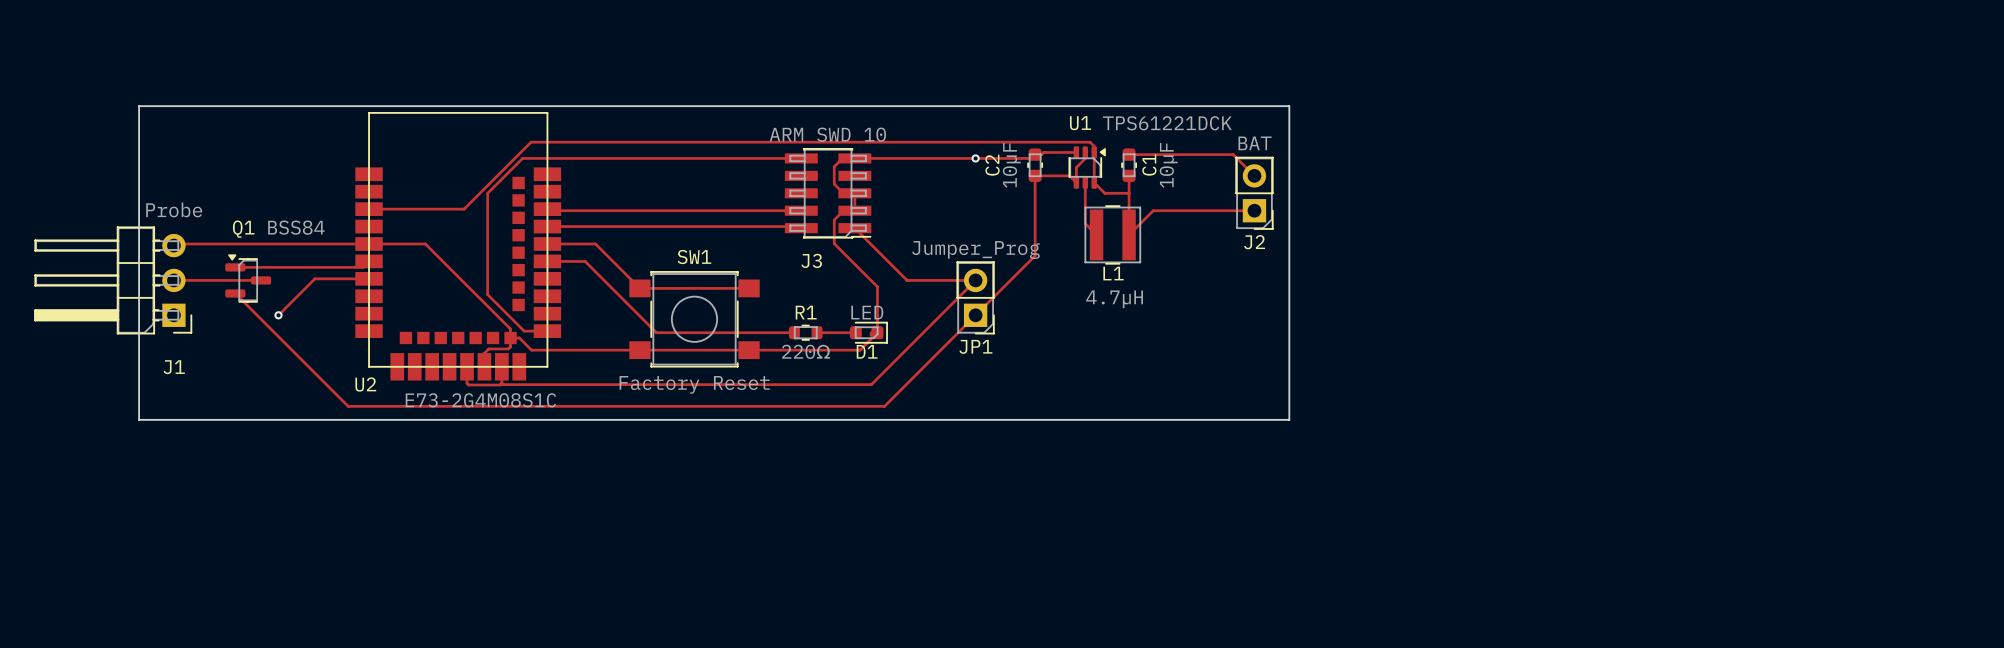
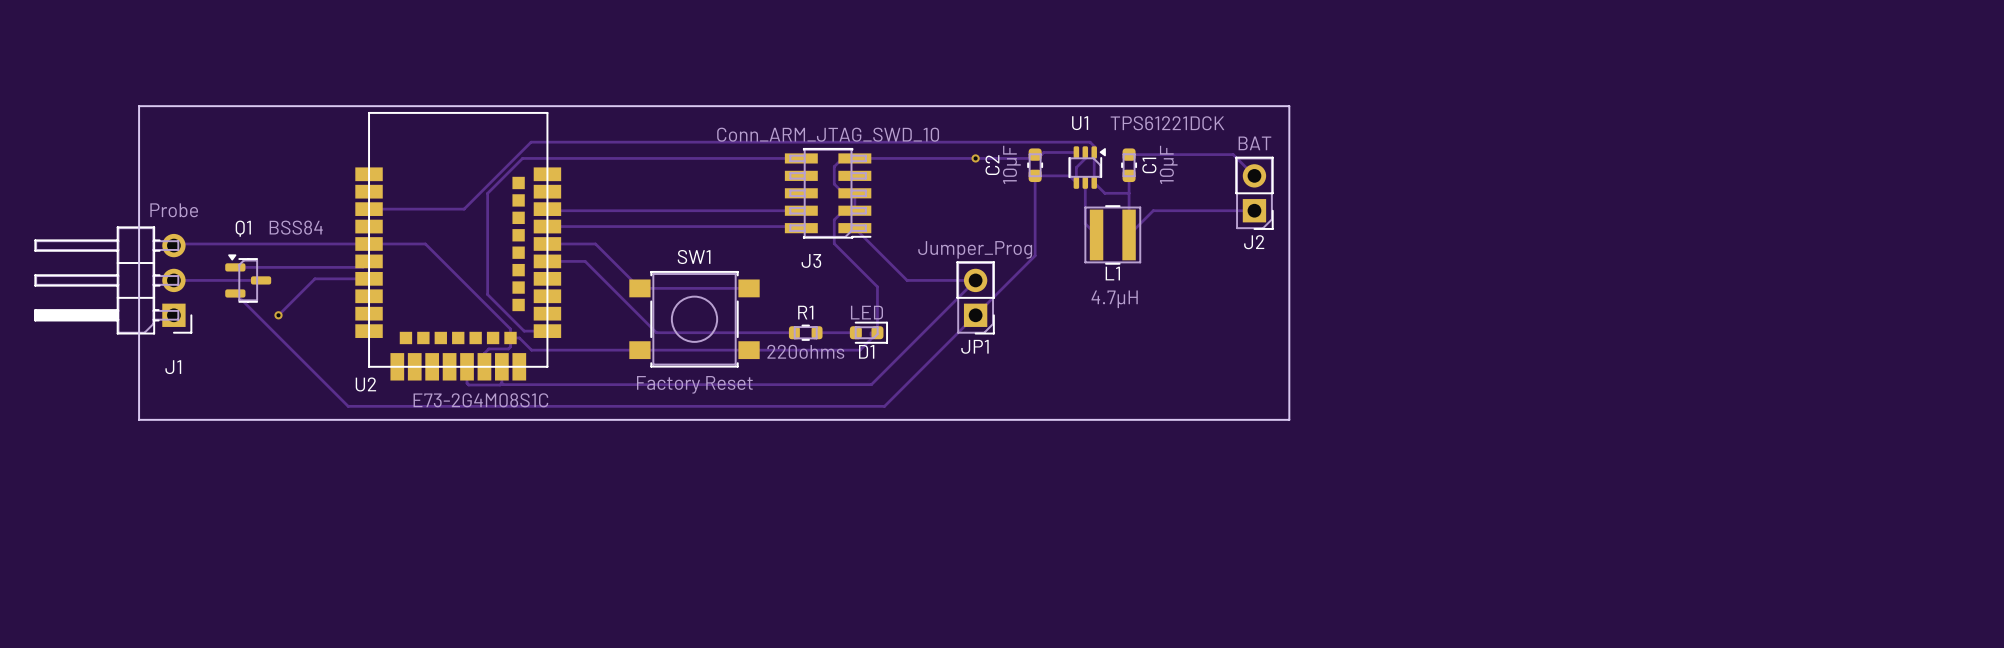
J3 value: ARM SWD 10 (827, 134) -> Conn_ARM_JTAG_SWD_10 (828, 134)
R1 value: 220Ω (806, 351) -> 220ohms (805, 351)

